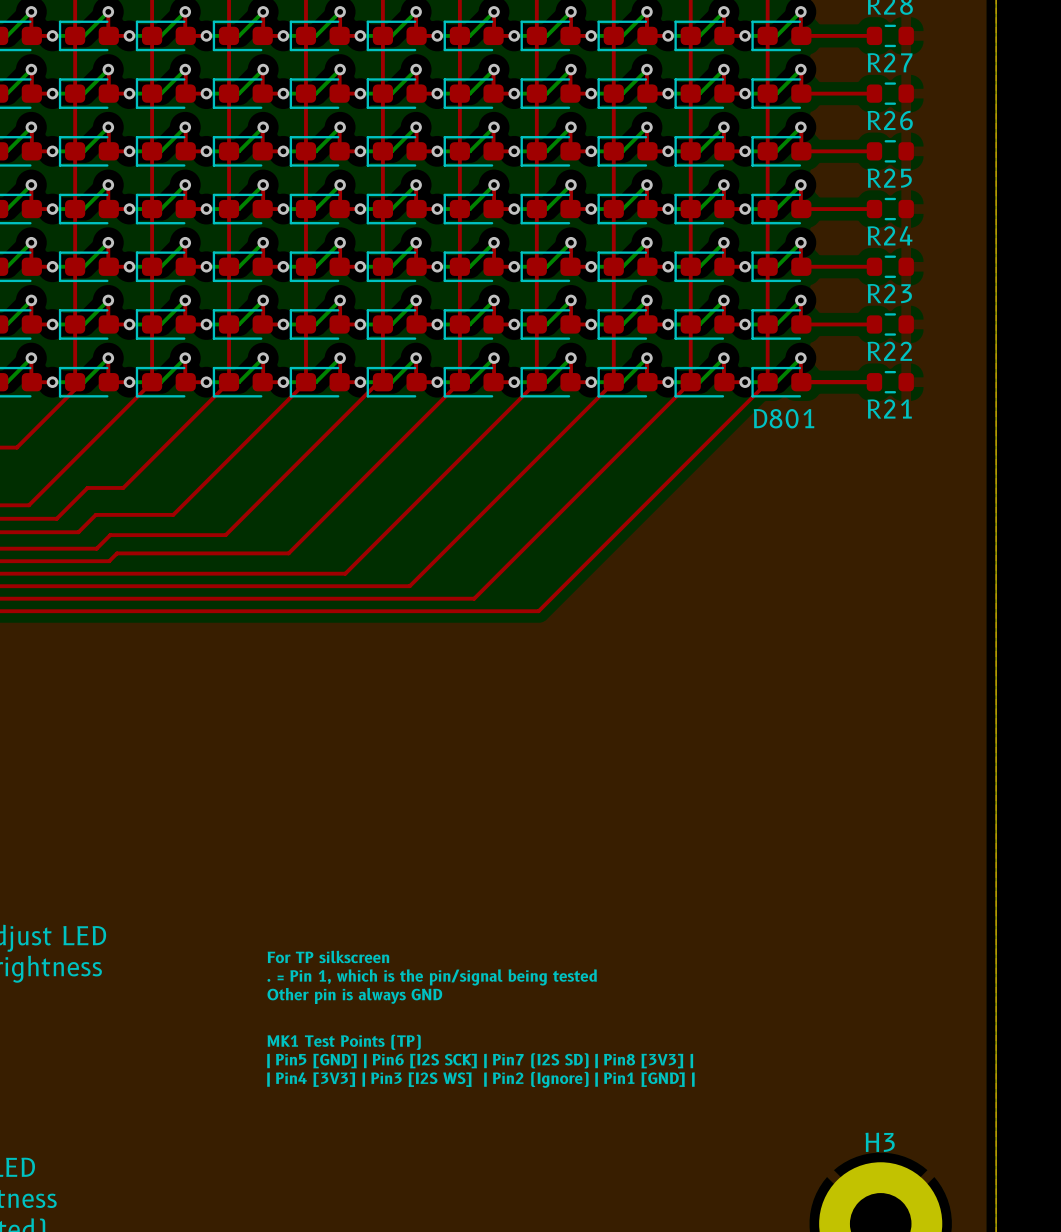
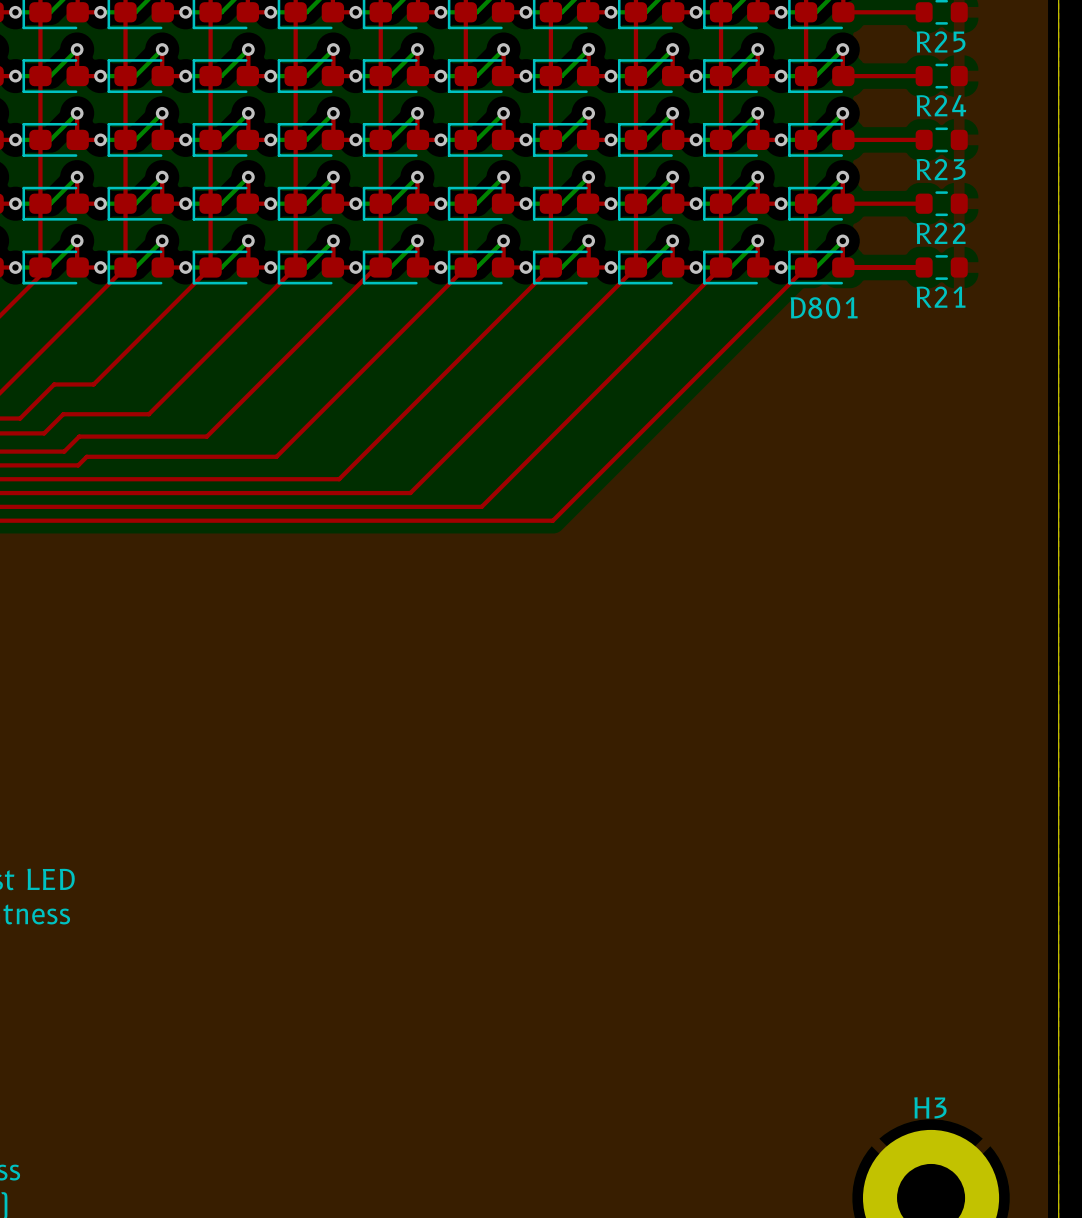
text: For TP silkscreen (328, 956) -> none
text: . = Pin 1, which is the pin/signal being tested (432, 977) -> none
text: Other pin is always GND (354, 995) -> none
text: MK1 Test Points (TP) (344, 1042) -> none
text: | Pin5 [GND] | Pin6 [I2S SCK] | Pin7 (I2S SD) | Pin8 [3V3] | (480, 1060) -> none
text: | Pin4 [3V3] | Pin3 [I2S WS] | Pin2 (Ignore) | Pin1 [GND] | (480, 1079) -> none

